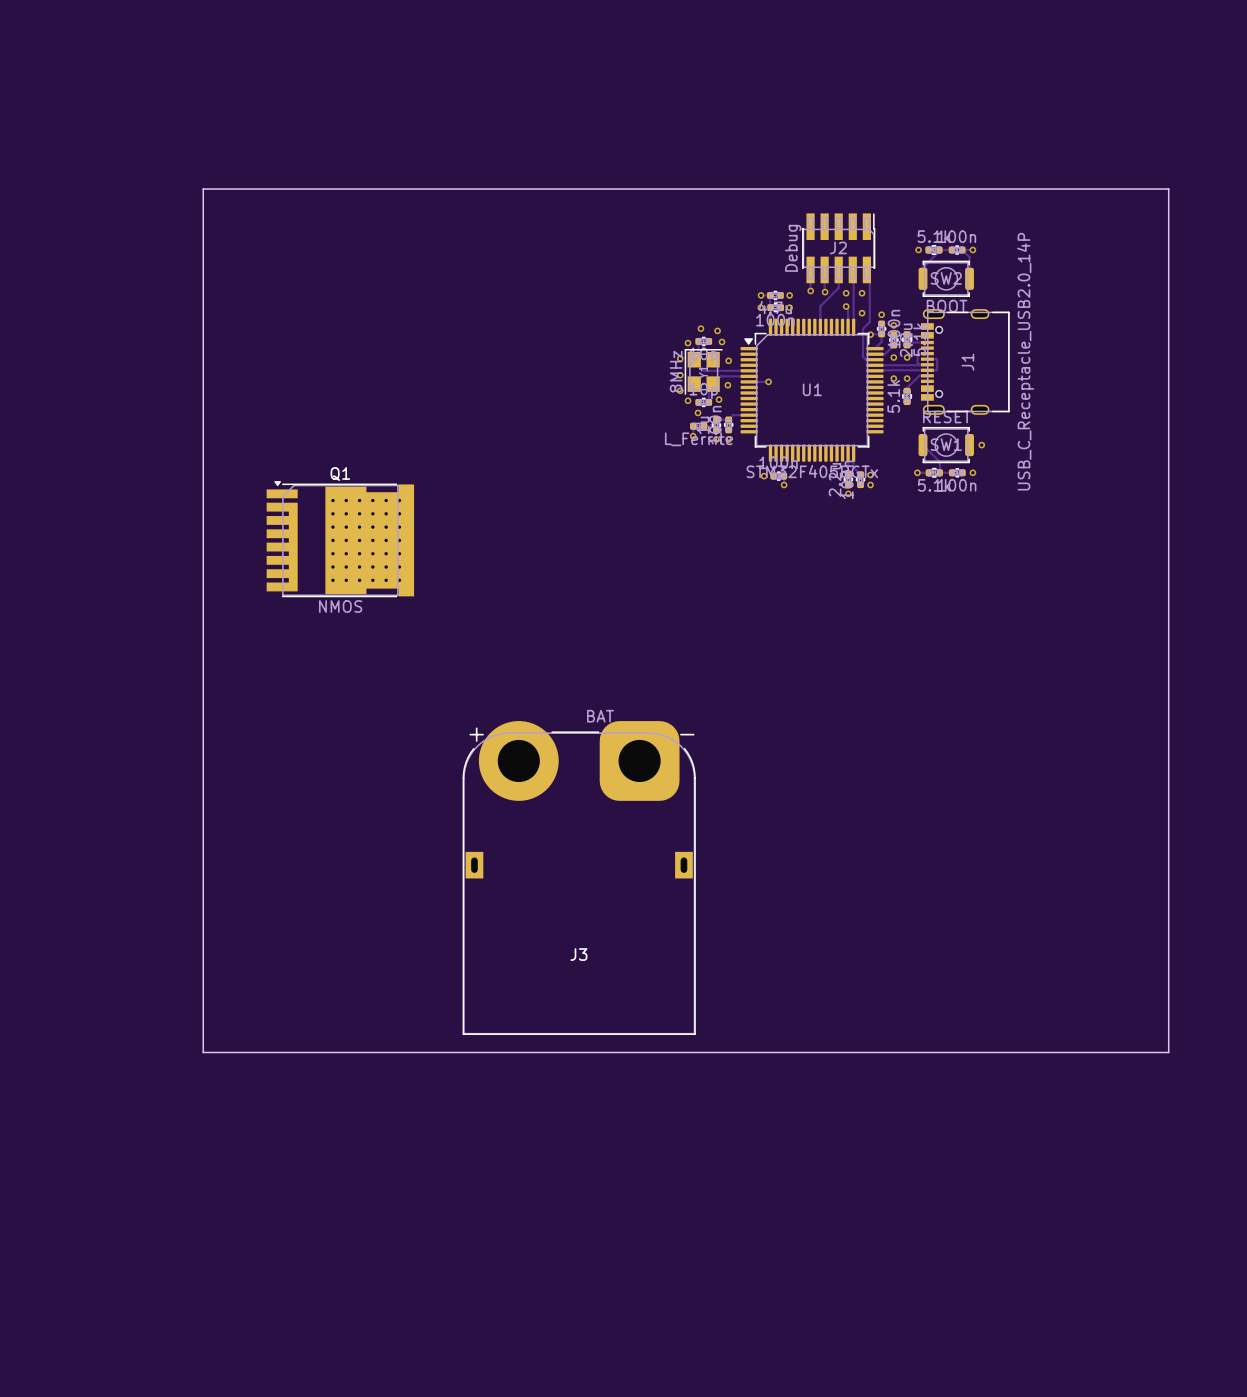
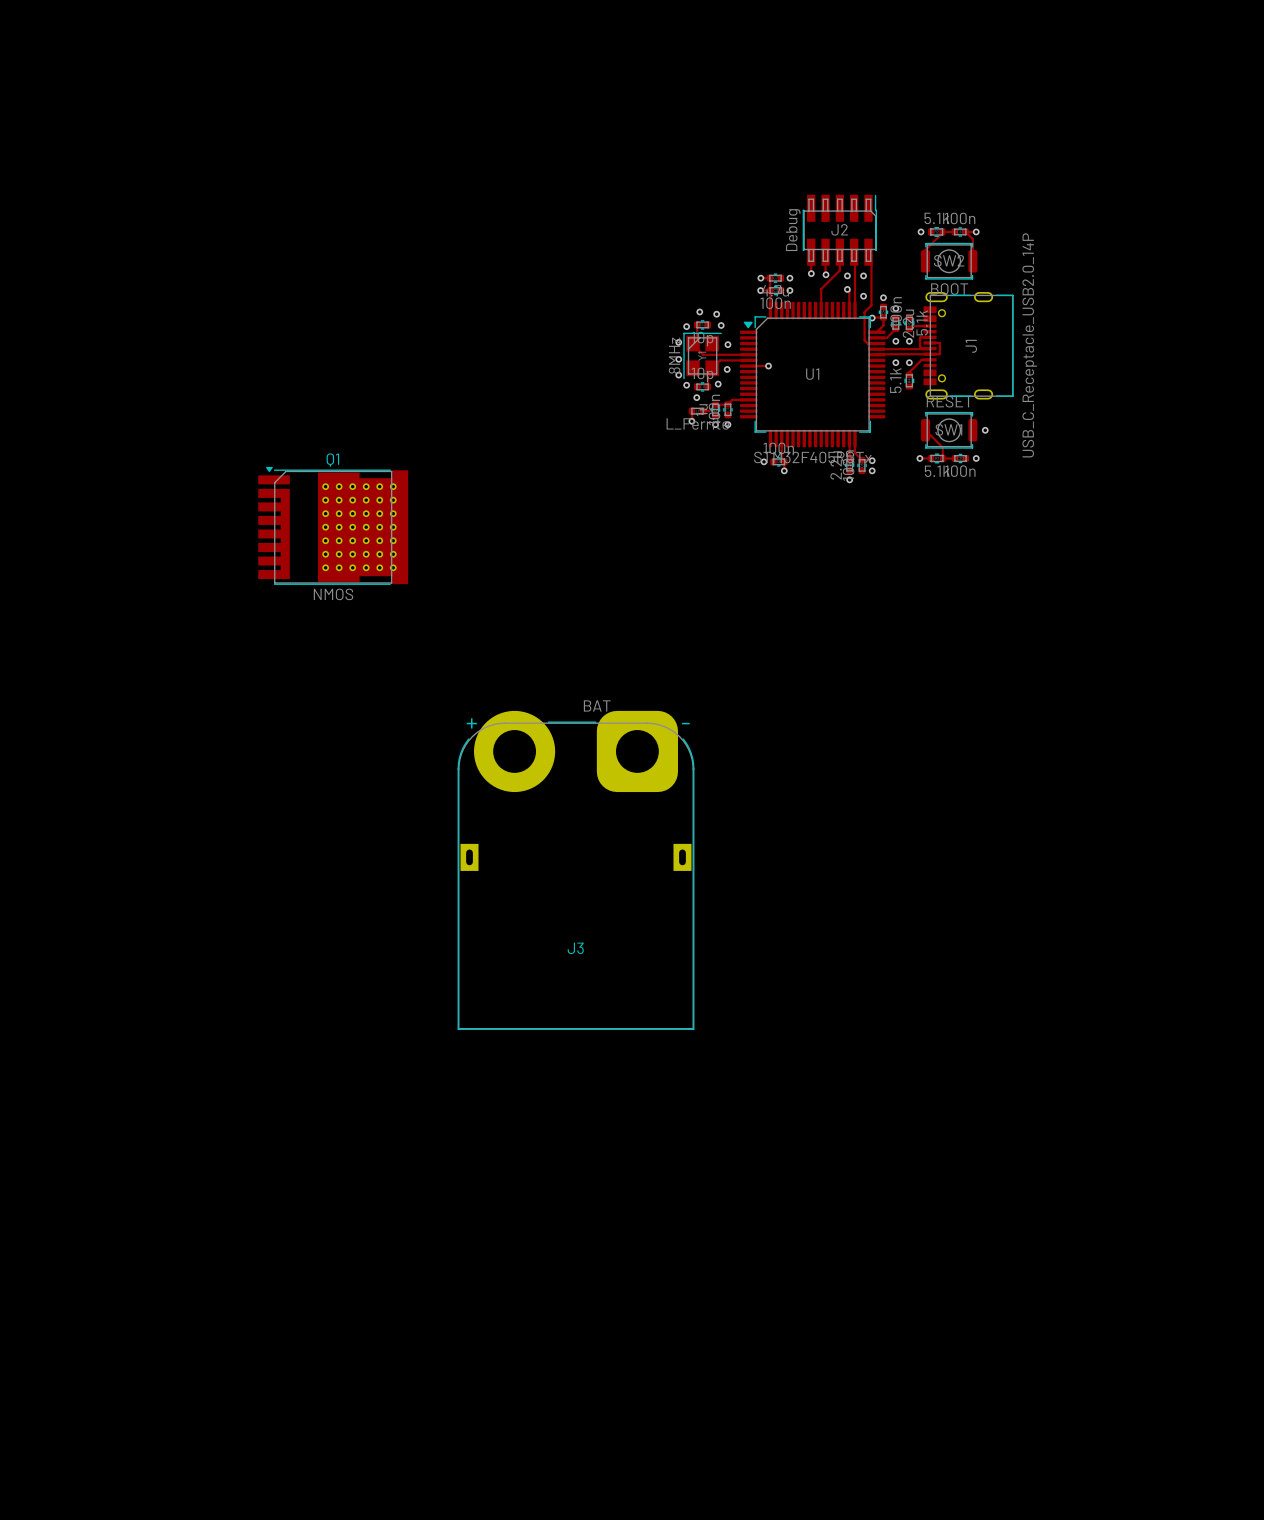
board edge: (203, 189) (1168, 189) (1168, 1052) (203, 1052) (203, 189) -> none

